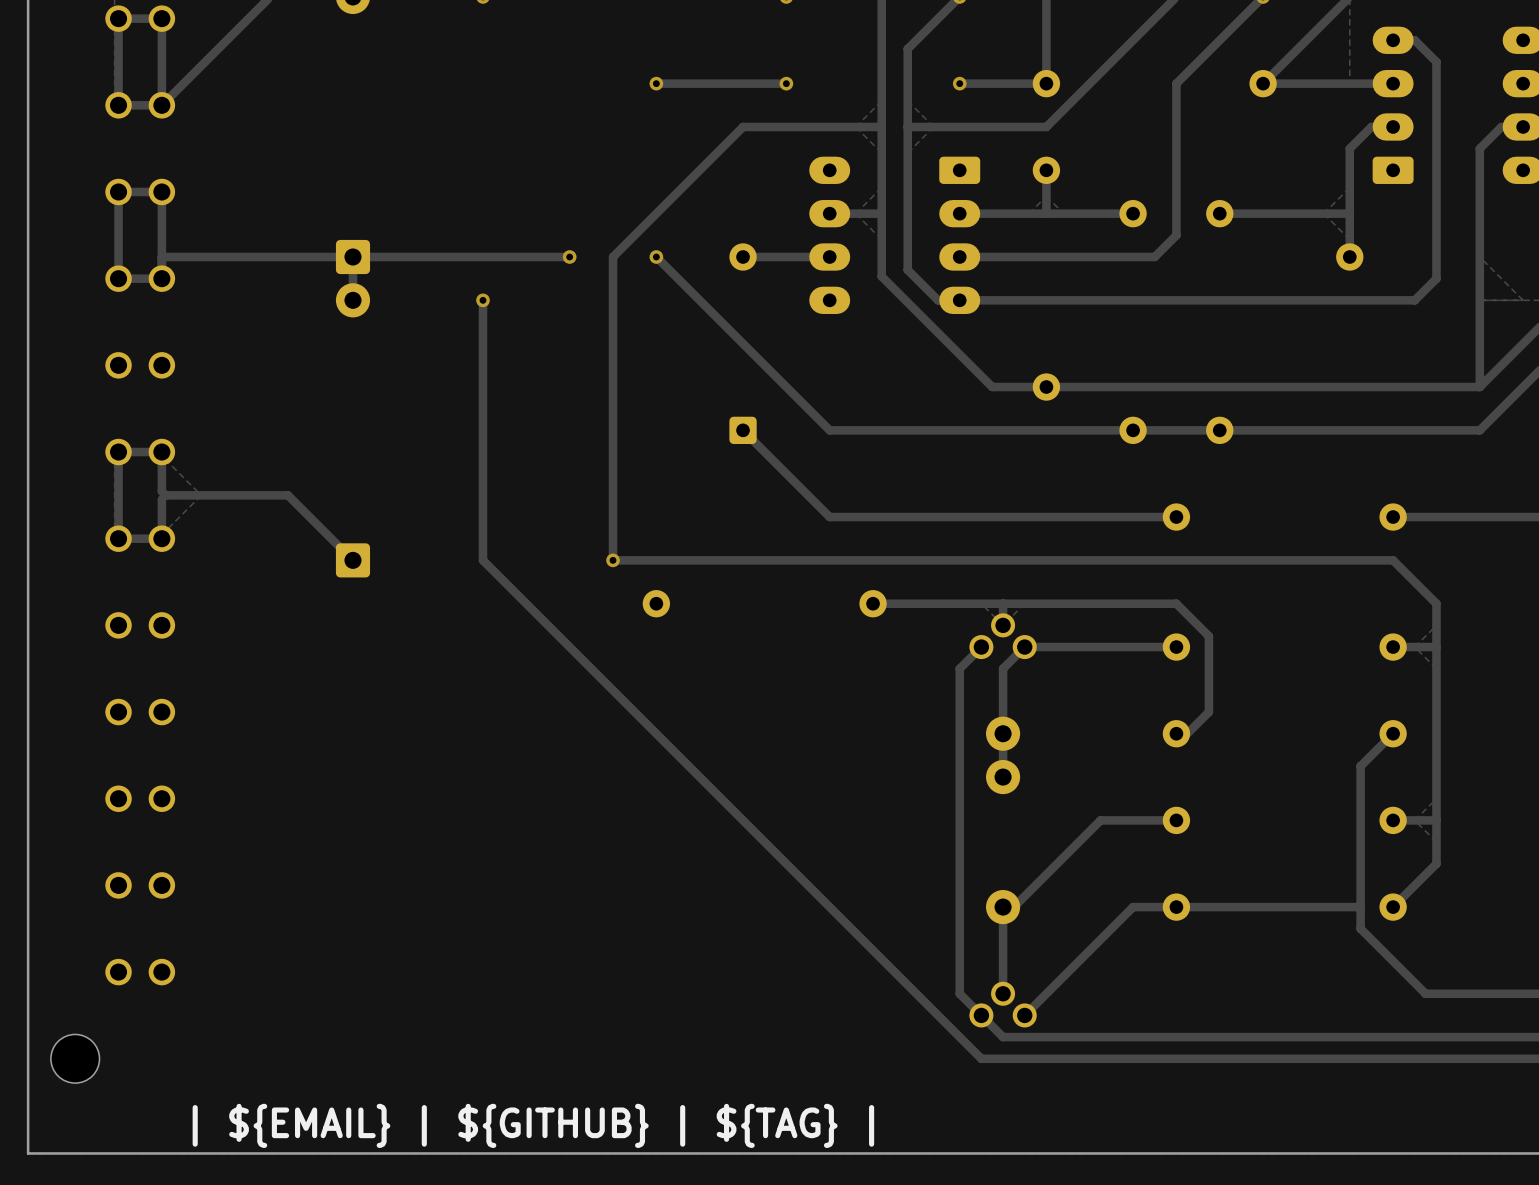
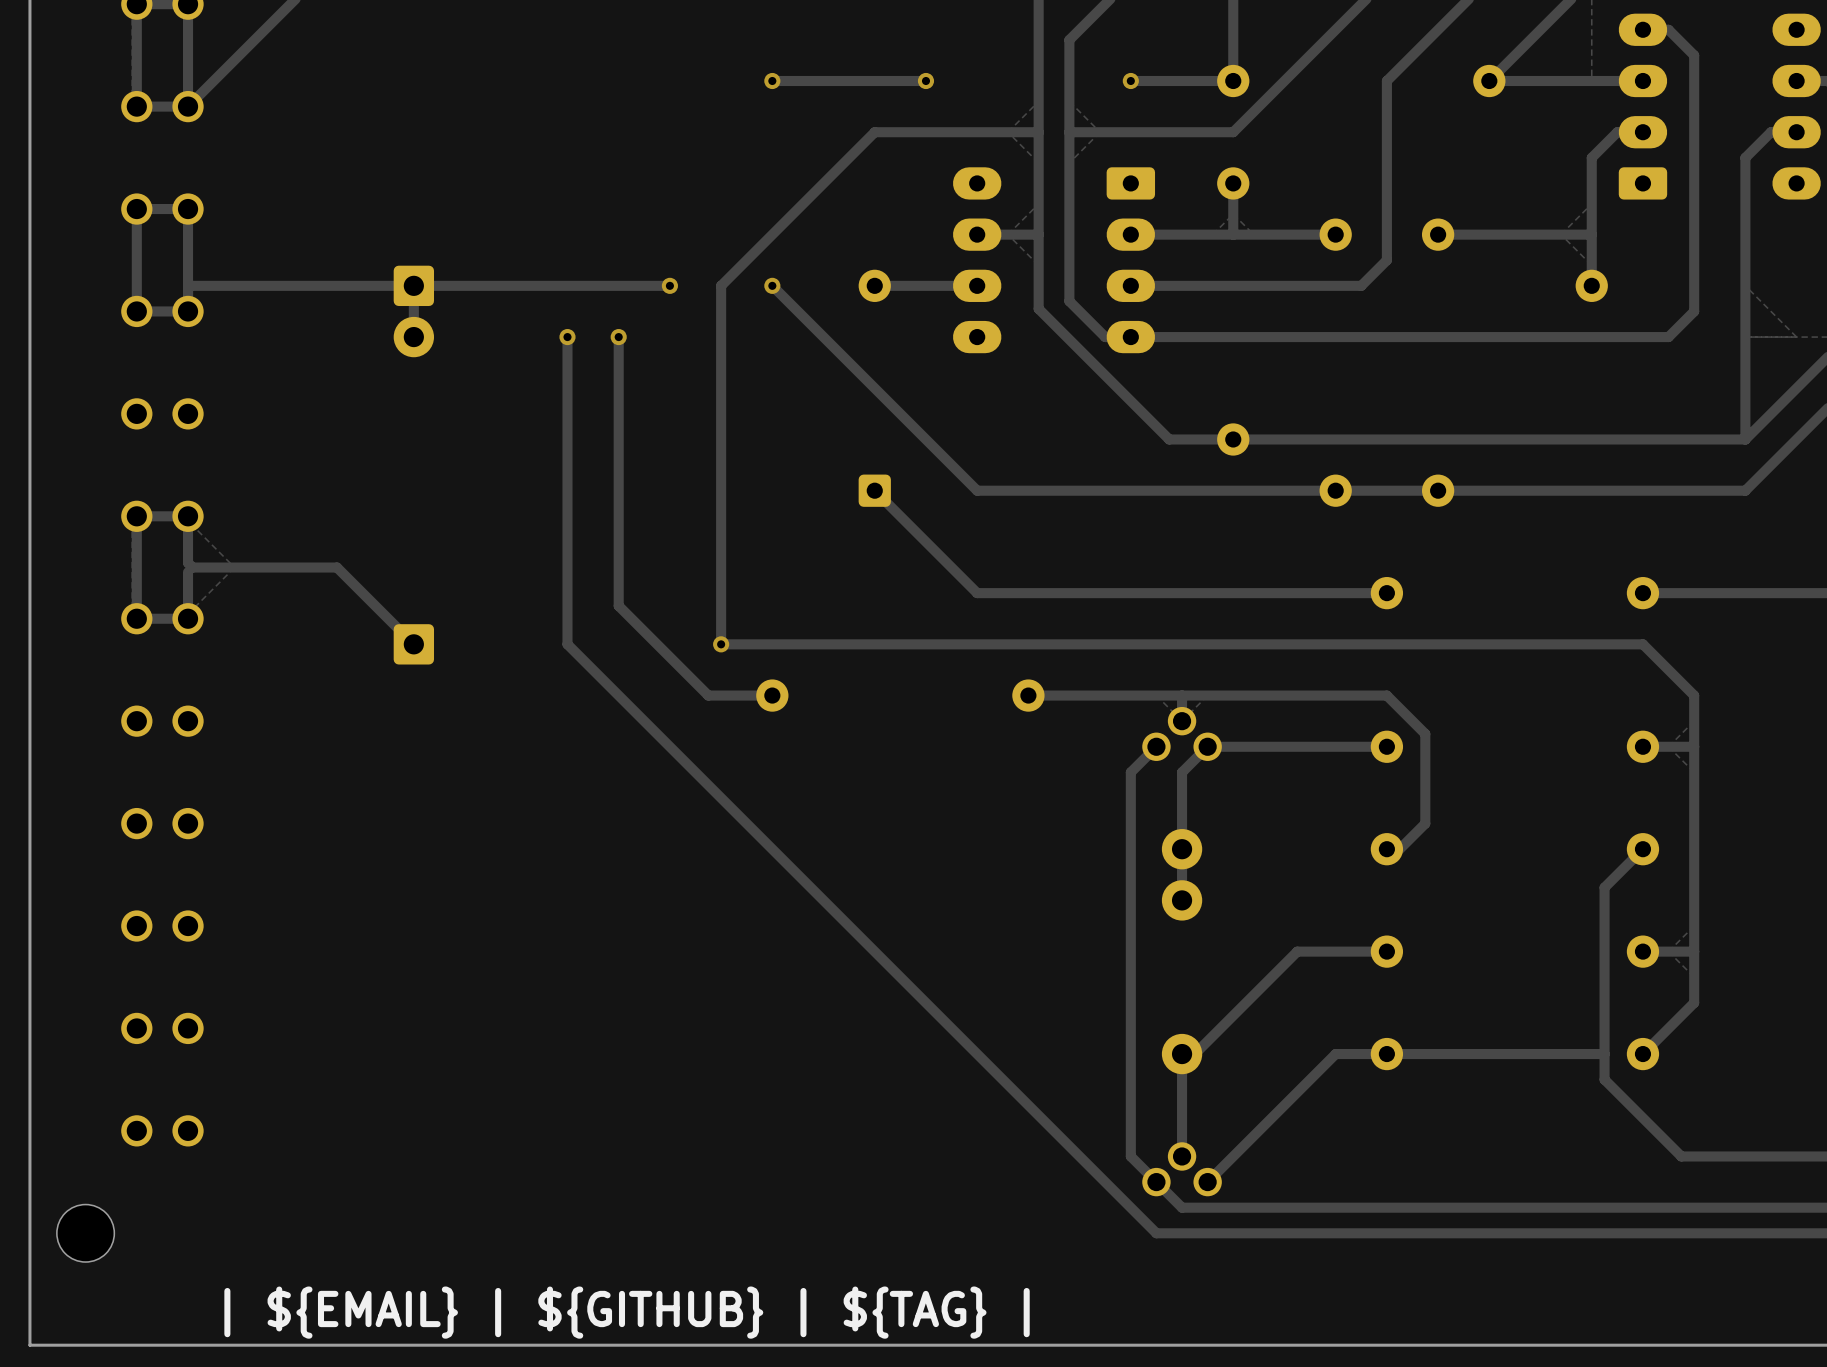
track: none -> (618, 337) (618, 605) (708, 695) (772, 695)
via: none -> (618, 337)

